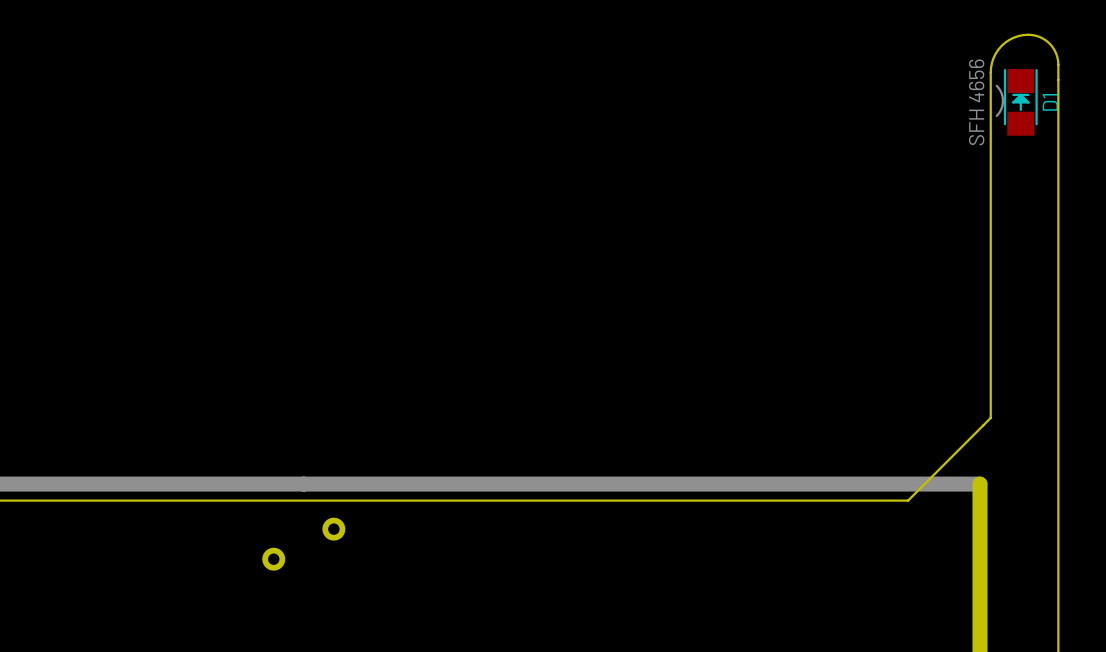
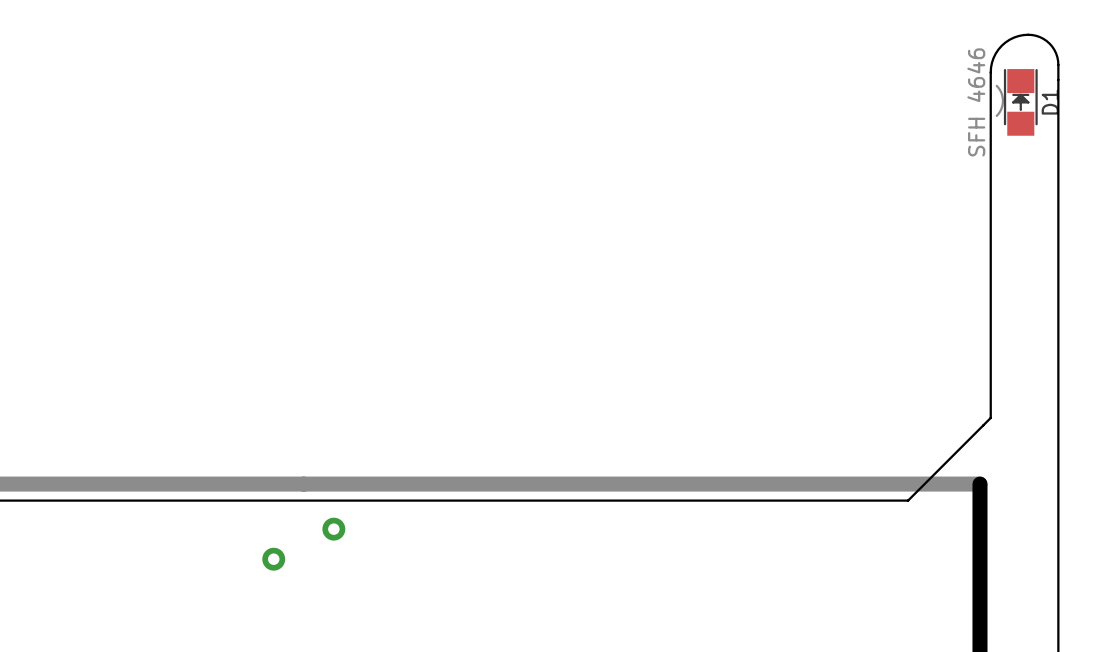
D1 value: SFH 4656 (976, 102) -> SFH 4646 (976, 102)

